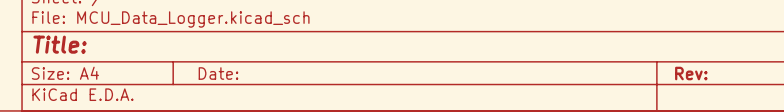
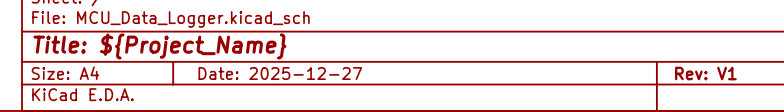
title block: Title: (60, 44) -> Title: ${Project_Name} (159, 46)
title block: Date: (218, 73) -> Date: 2025-12-27 (280, 73)
title block: Rev: (691, 73) -> Rev: V1 (705, 73)

